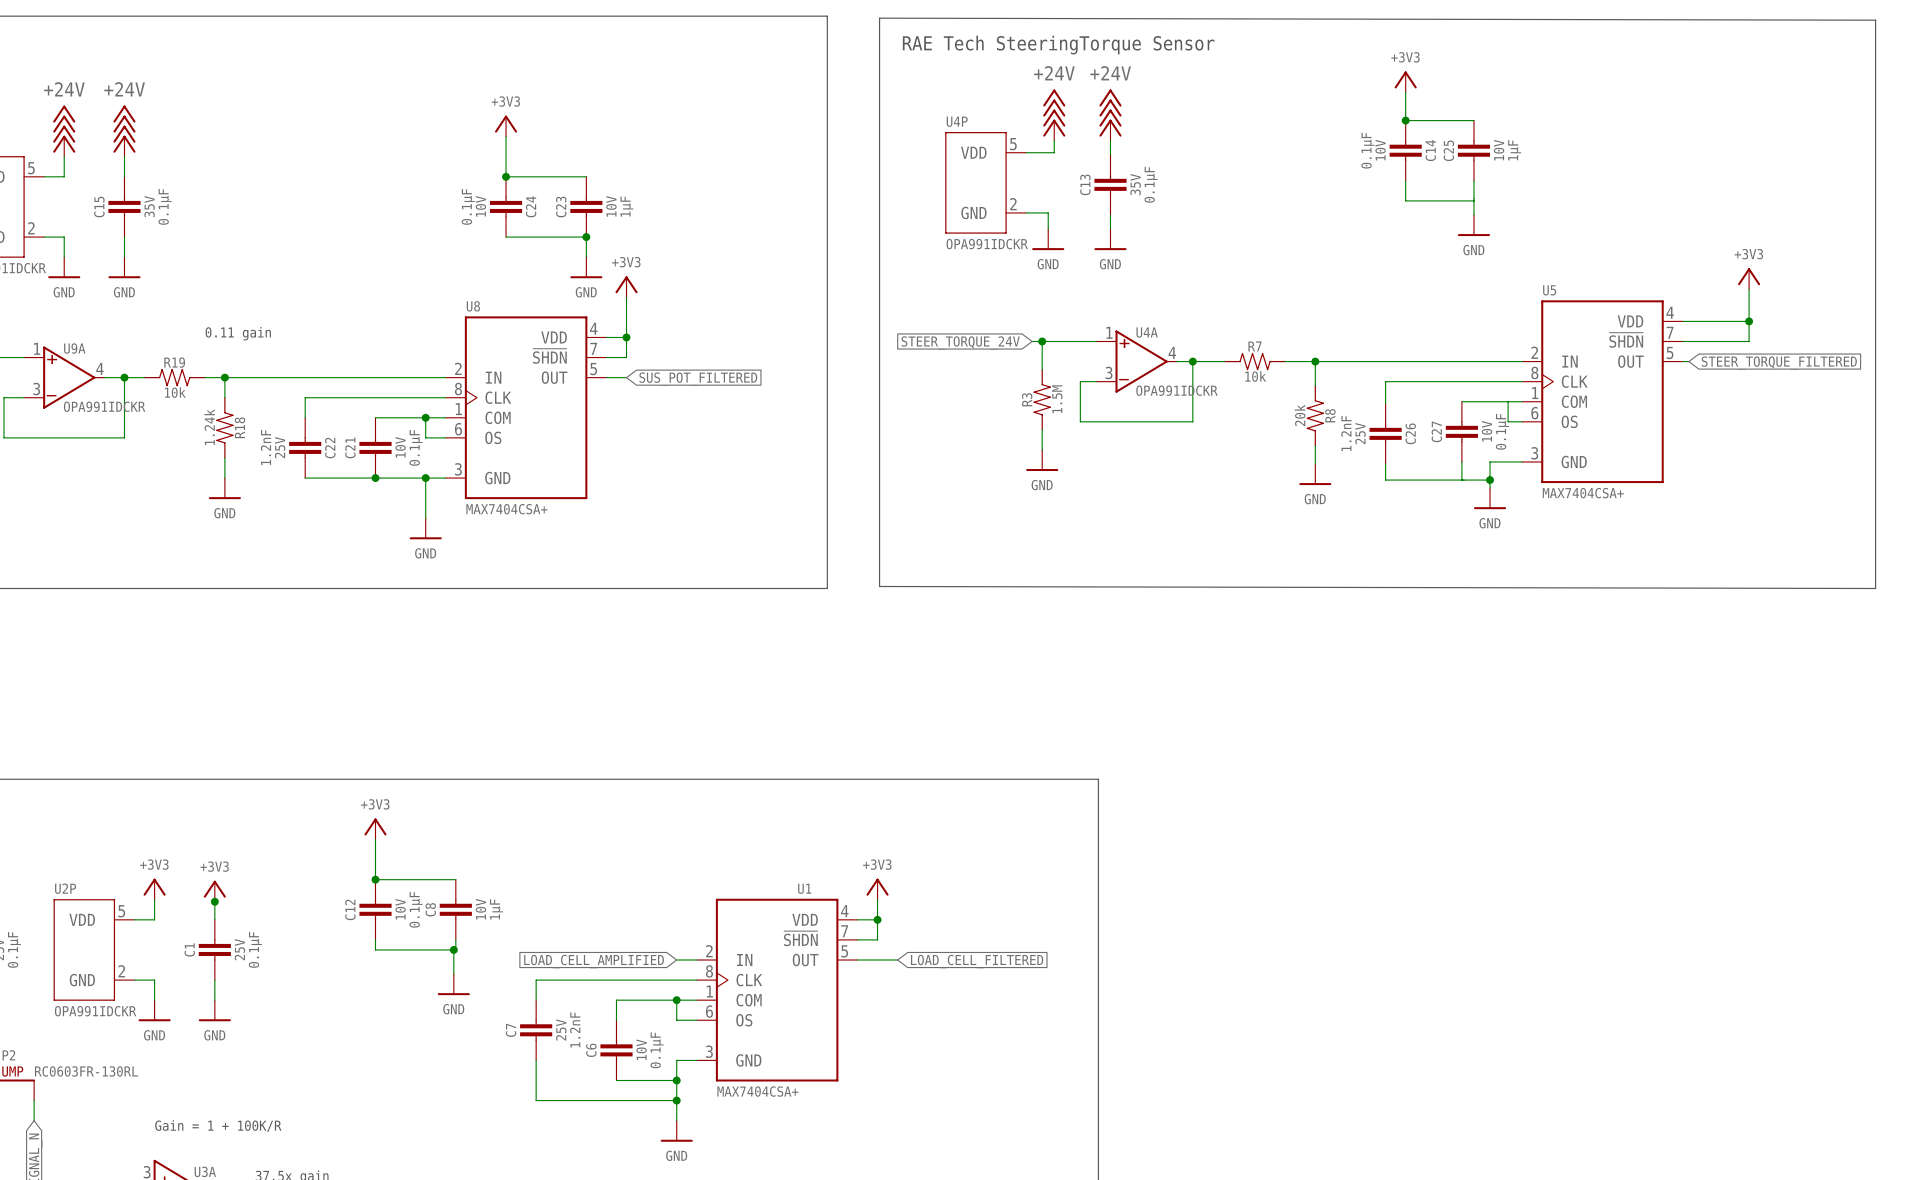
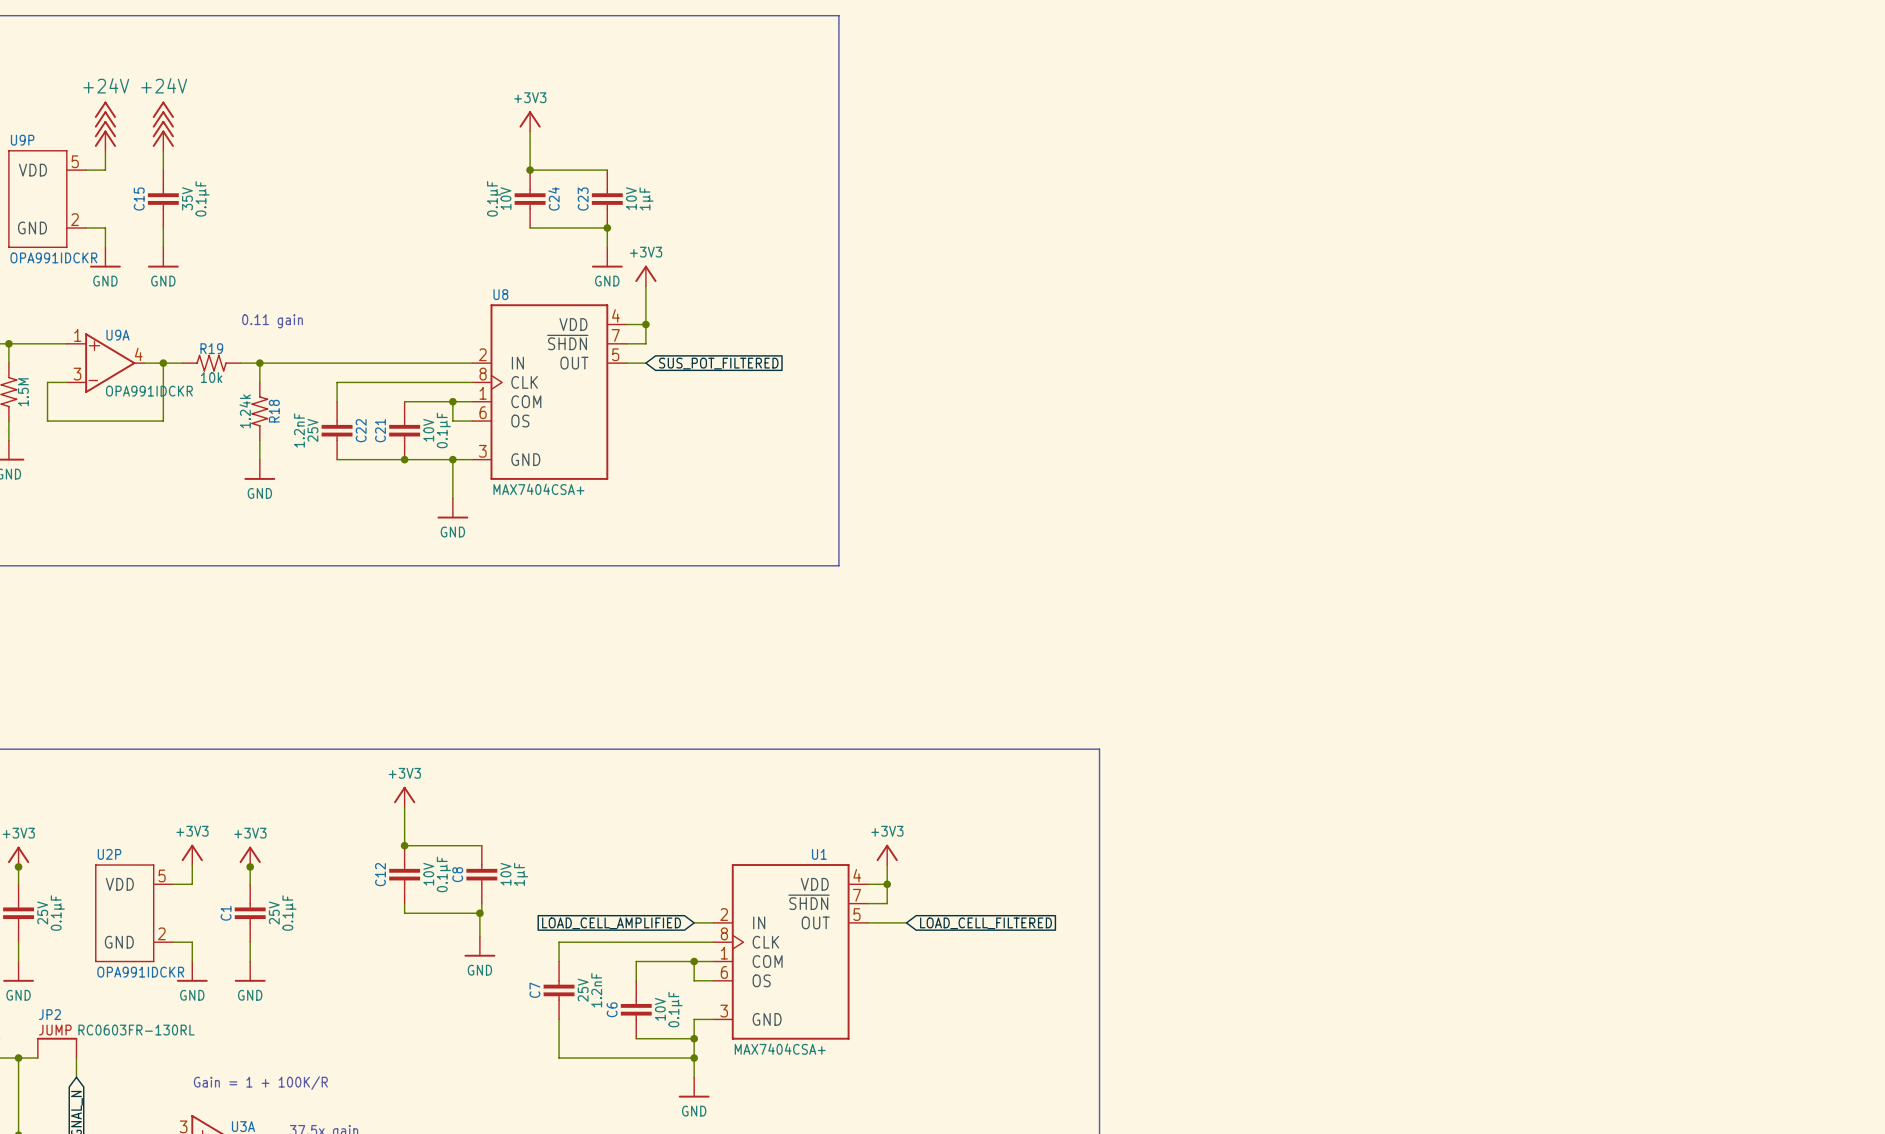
line: (879, 18) (879, 586) (1875, 588) (1875, 20) (879, 18) -> none
text: RAE Tech SteeringTorque Sensor (1058, 45) -> none
power symbol: +3V3 (1405, 81) -> none
wire: (1405, 92) (1405, 120) (1473, 120) -> none
power symbol: +24V (1054, 115) -> none
power symbol: +24V (1110, 115) -> none
junction: (1405, 120) -> none
wire: (1054, 140) (1054, 152) (1026, 152) -> none
wire: (1110, 140) (1110, 154) -> none
C14: (1405, 150) -> none
C25: (1473, 150) -> none
wire: (1405, 180) (1405, 200) (1473, 200) -> none
wire: (1473, 180) (1473, 214) -> none
U4P: (985, 182) -> none
C13: (1110, 184) -> none
wire: (1026, 212) (1048, 212) (1048, 229) -> none
wire: (1110, 214) (1110, 229) -> none
power symbol: GND (1473, 225) -> none
power symbol: GND (1048, 239) -> none
power symbol: GND (1110, 239) -> none
power symbol: +3V3 (1749, 278) -> none
wire: (1749, 289) (1749, 341) (1682, 341) -> none
wire: (1682, 321) (1749, 321) -> none
junction: (1749, 321) -> none
wire: (1032, 341) (1096, 341) -> none
wire: (1042, 341) (1042, 369) -> none
junction: (1042, 341) -> none
global label: STEER_TORQUE_24V (960, 343) -> none
U4A: (1136, 361) -> none
wire: (1176, 361) (1224, 361) -> none
wire: (1192, 361) (1192, 421) (1080, 421) (1080, 381) (1096, 381) -> none
junction: (1192, 361) -> none
R7: (1255, 361) -> none
wire: (1285, 361) (1522, 361) -> none
wire: (1315, 361) (1315, 385) -> none
junction: (1315, 361) -> none
wire: (1682, 361) (1688, 361) -> none
global label: STEER_TORQUE_FILTERED (1779, 363) -> none
wire: (1522, 381) (1385, 381) (1385, 403) -> none
U5: (1602, 391) -> none
R3: (1042, 399) -> none
wire: (1461, 401) (1522, 401) -> none
wire: (1508, 401) (1508, 421) (1522, 421) -> none
R8: (1315, 415) -> none
wire: (1042, 429) (1042, 449) -> none
C27: (1461, 431) -> none
C26: (1385, 433) -> none
wire: (1315, 445) (1315, 463) -> none
power symbol: GND (1042, 460) -> none
wire: (1461, 461) (1461, 480) -> none
wire: (1522, 461) (1490, 461) (1490, 488) -> none
wire: (1385, 463) (1385, 480) (1490, 480) -> none
power symbol: GND (1315, 474) -> none
junction: (1490, 480) -> none
power symbol: GND (1490, 498) -> none

